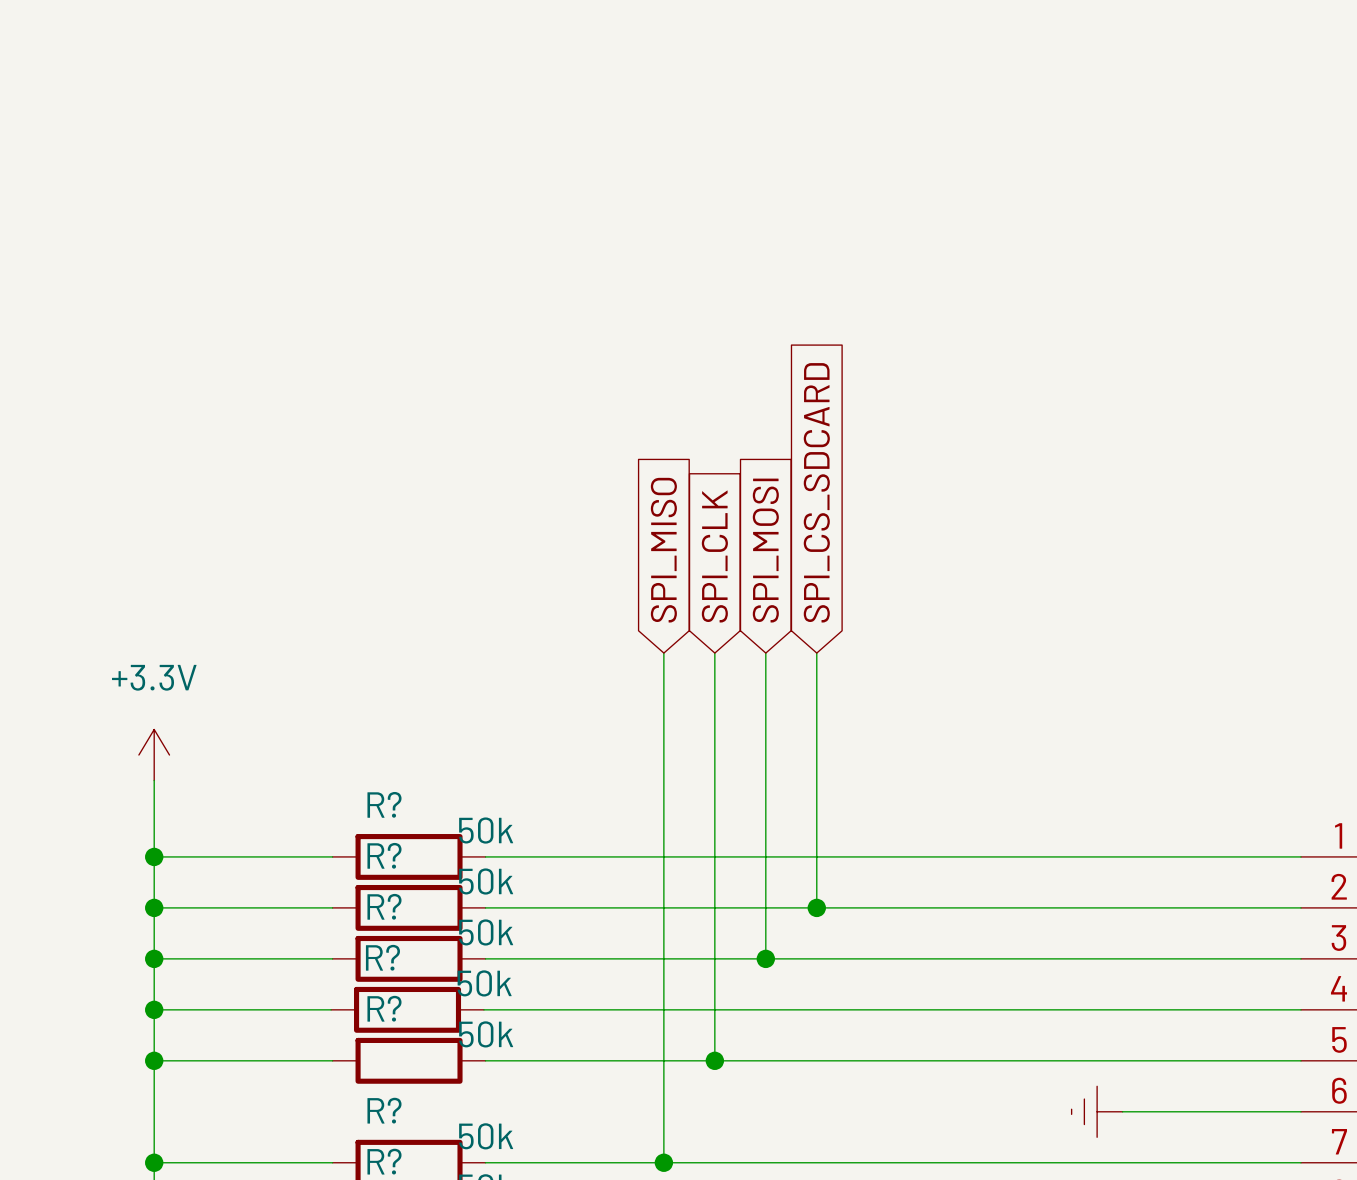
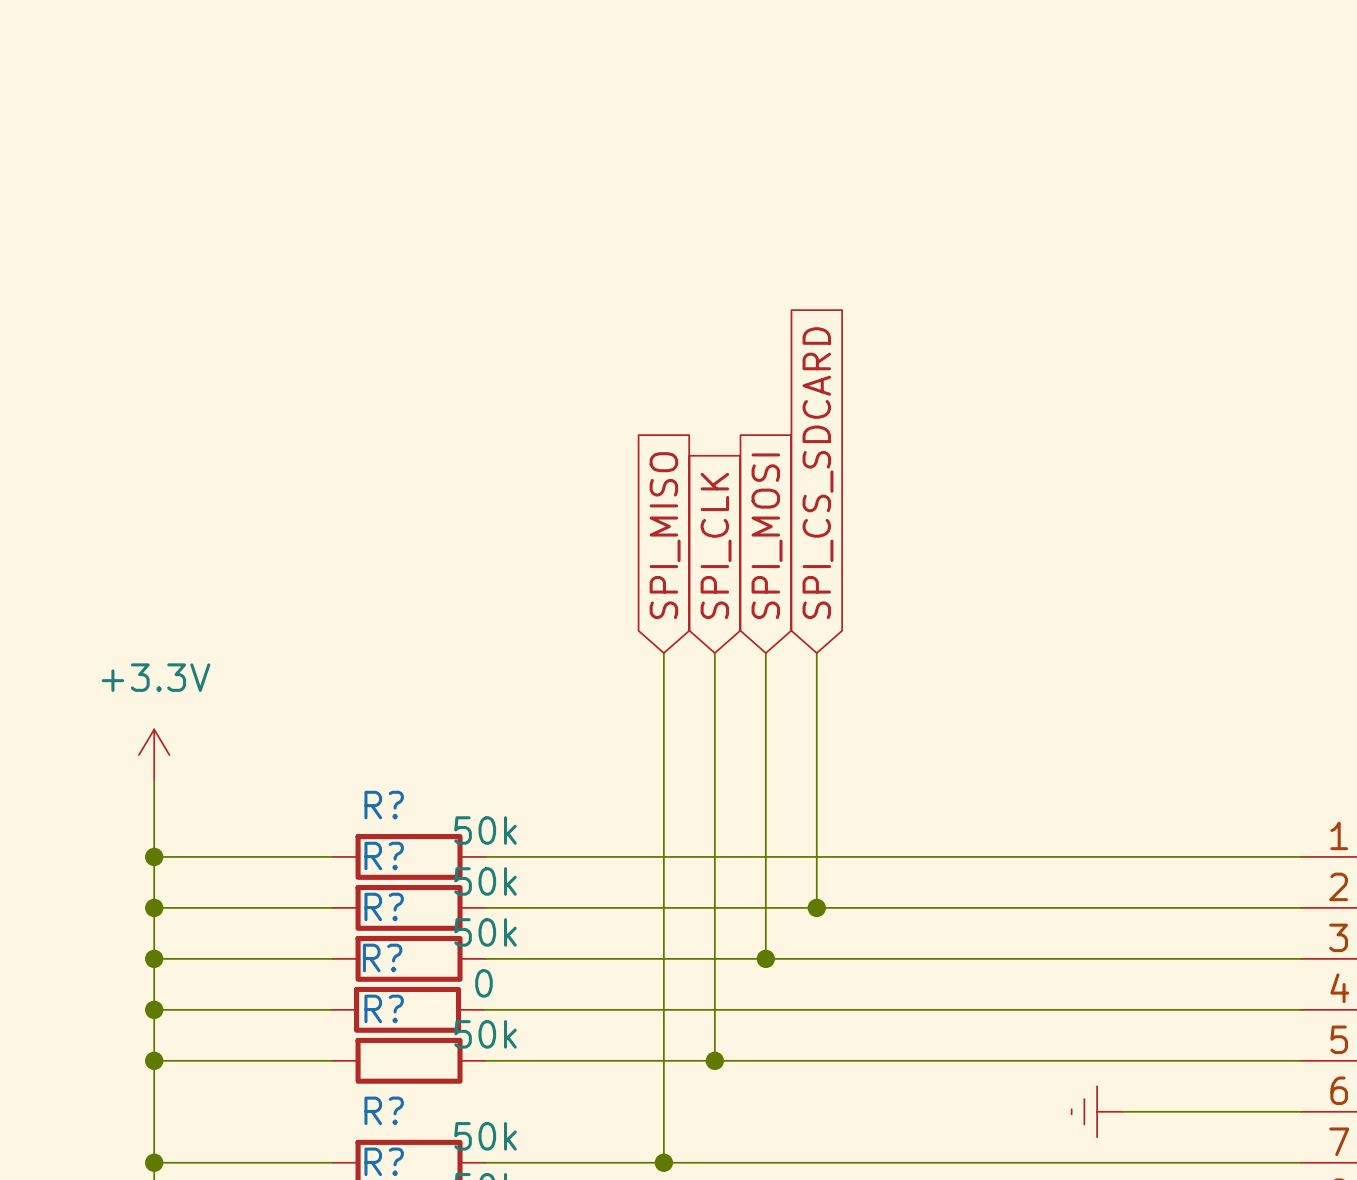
R? value: 50k (484, 983) -> 0 (483, 983)

